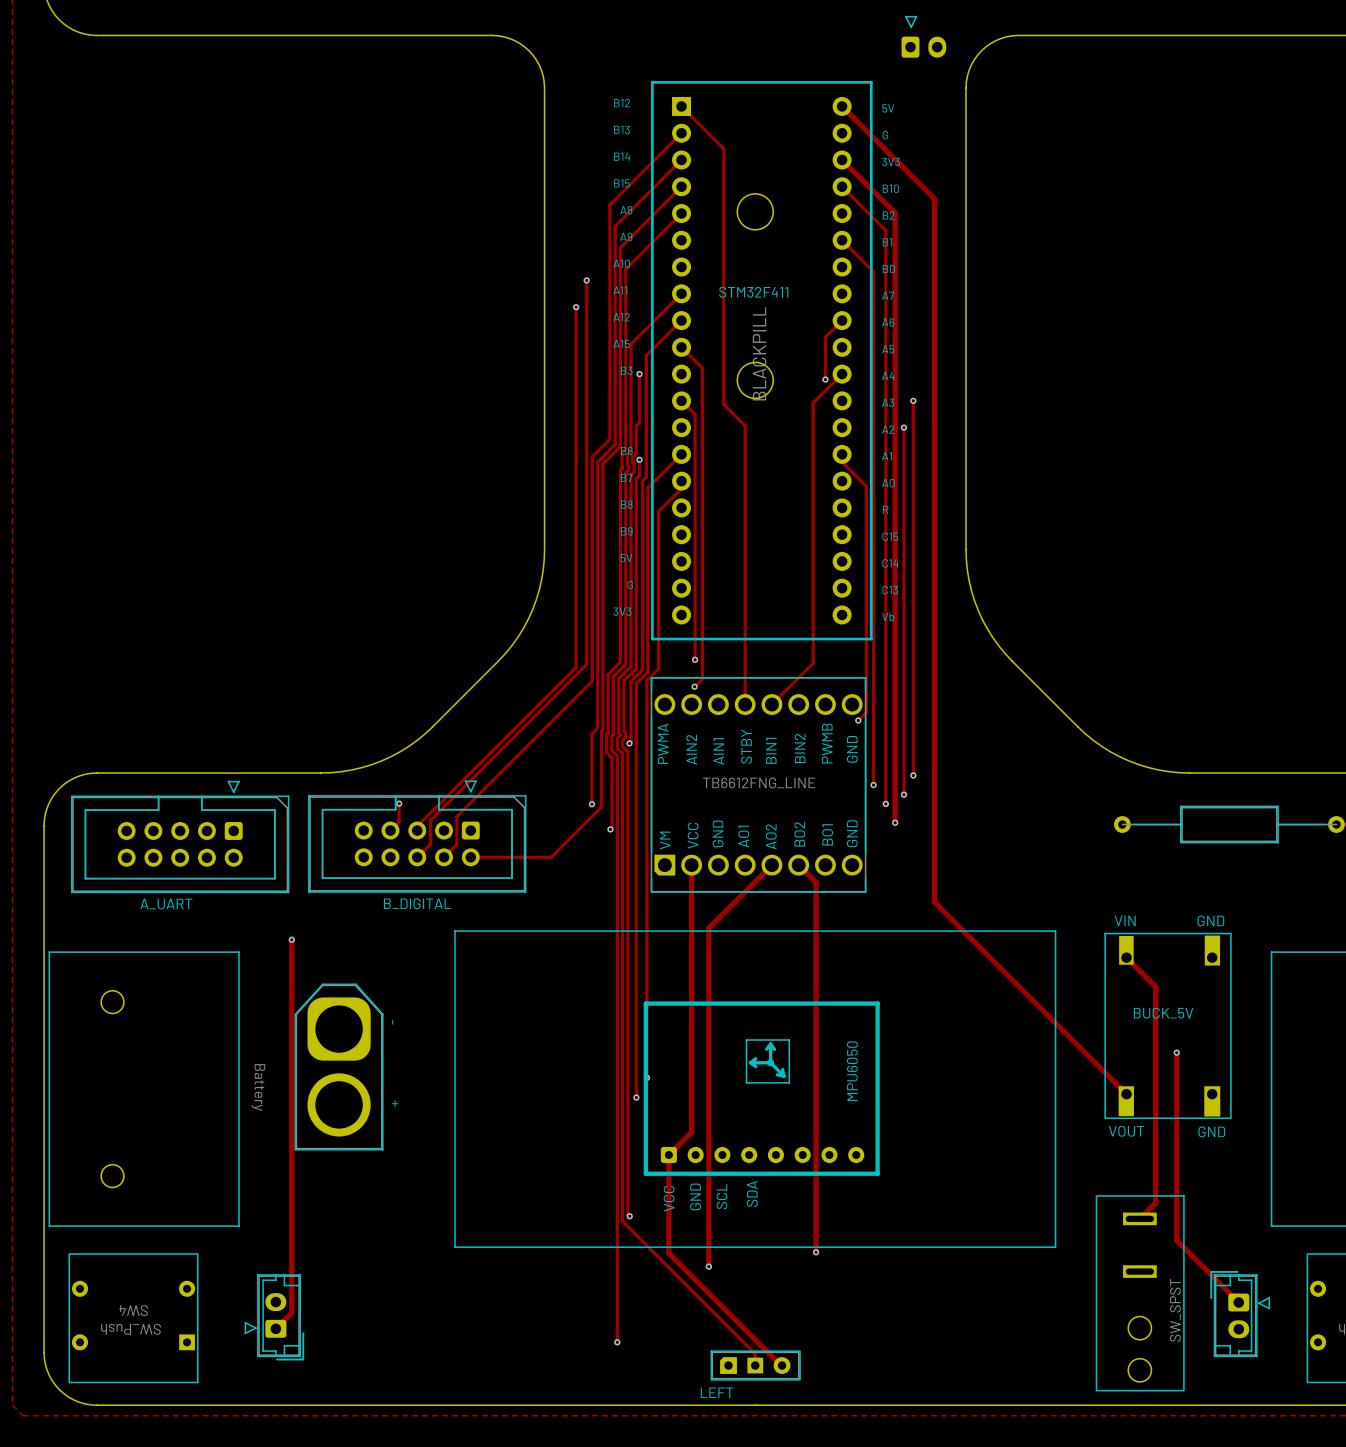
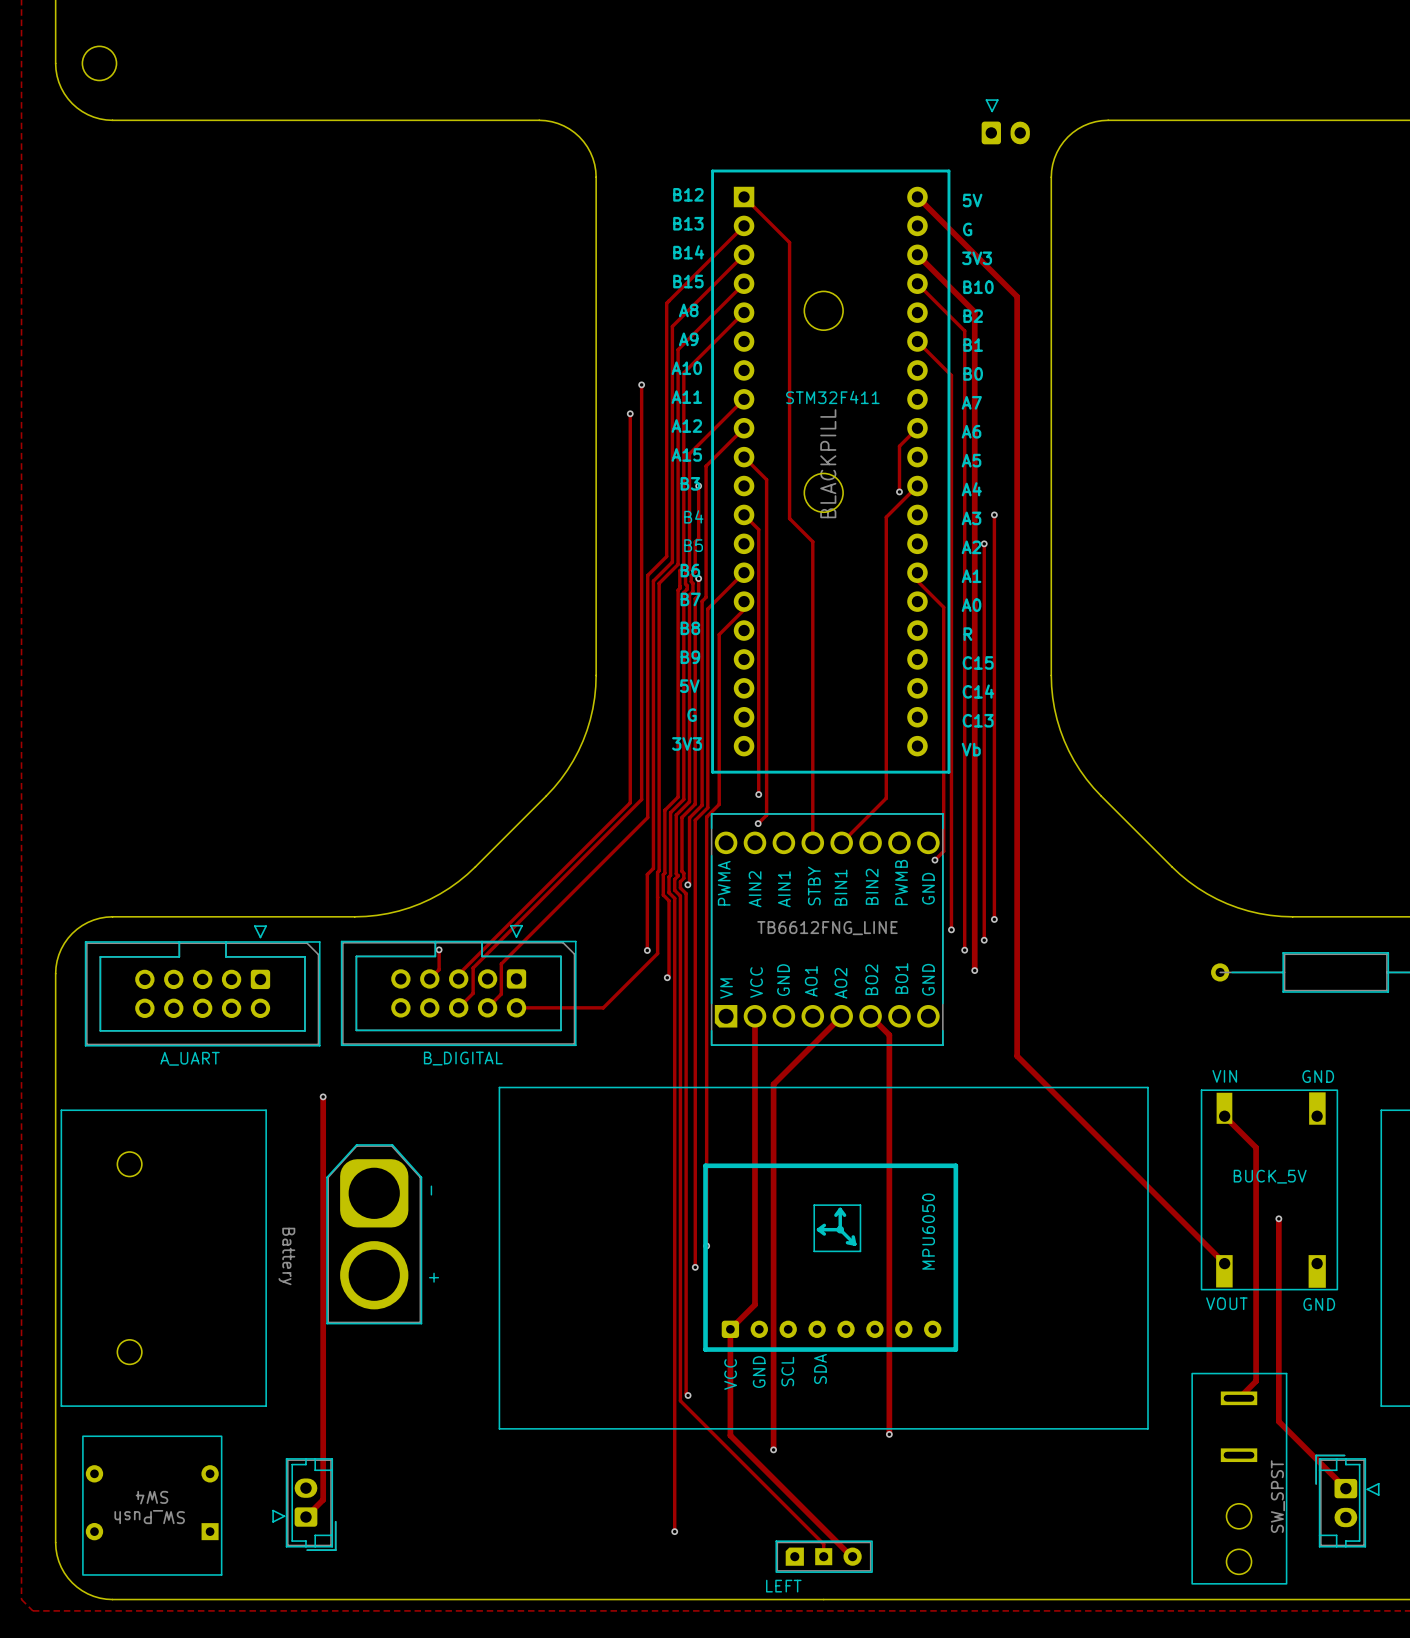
part footprint: [651, 81, 873, 641] -> [711, 169, 951, 774]
text: none -> B4 (693, 516)
text: none -> B5 (693, 545)

